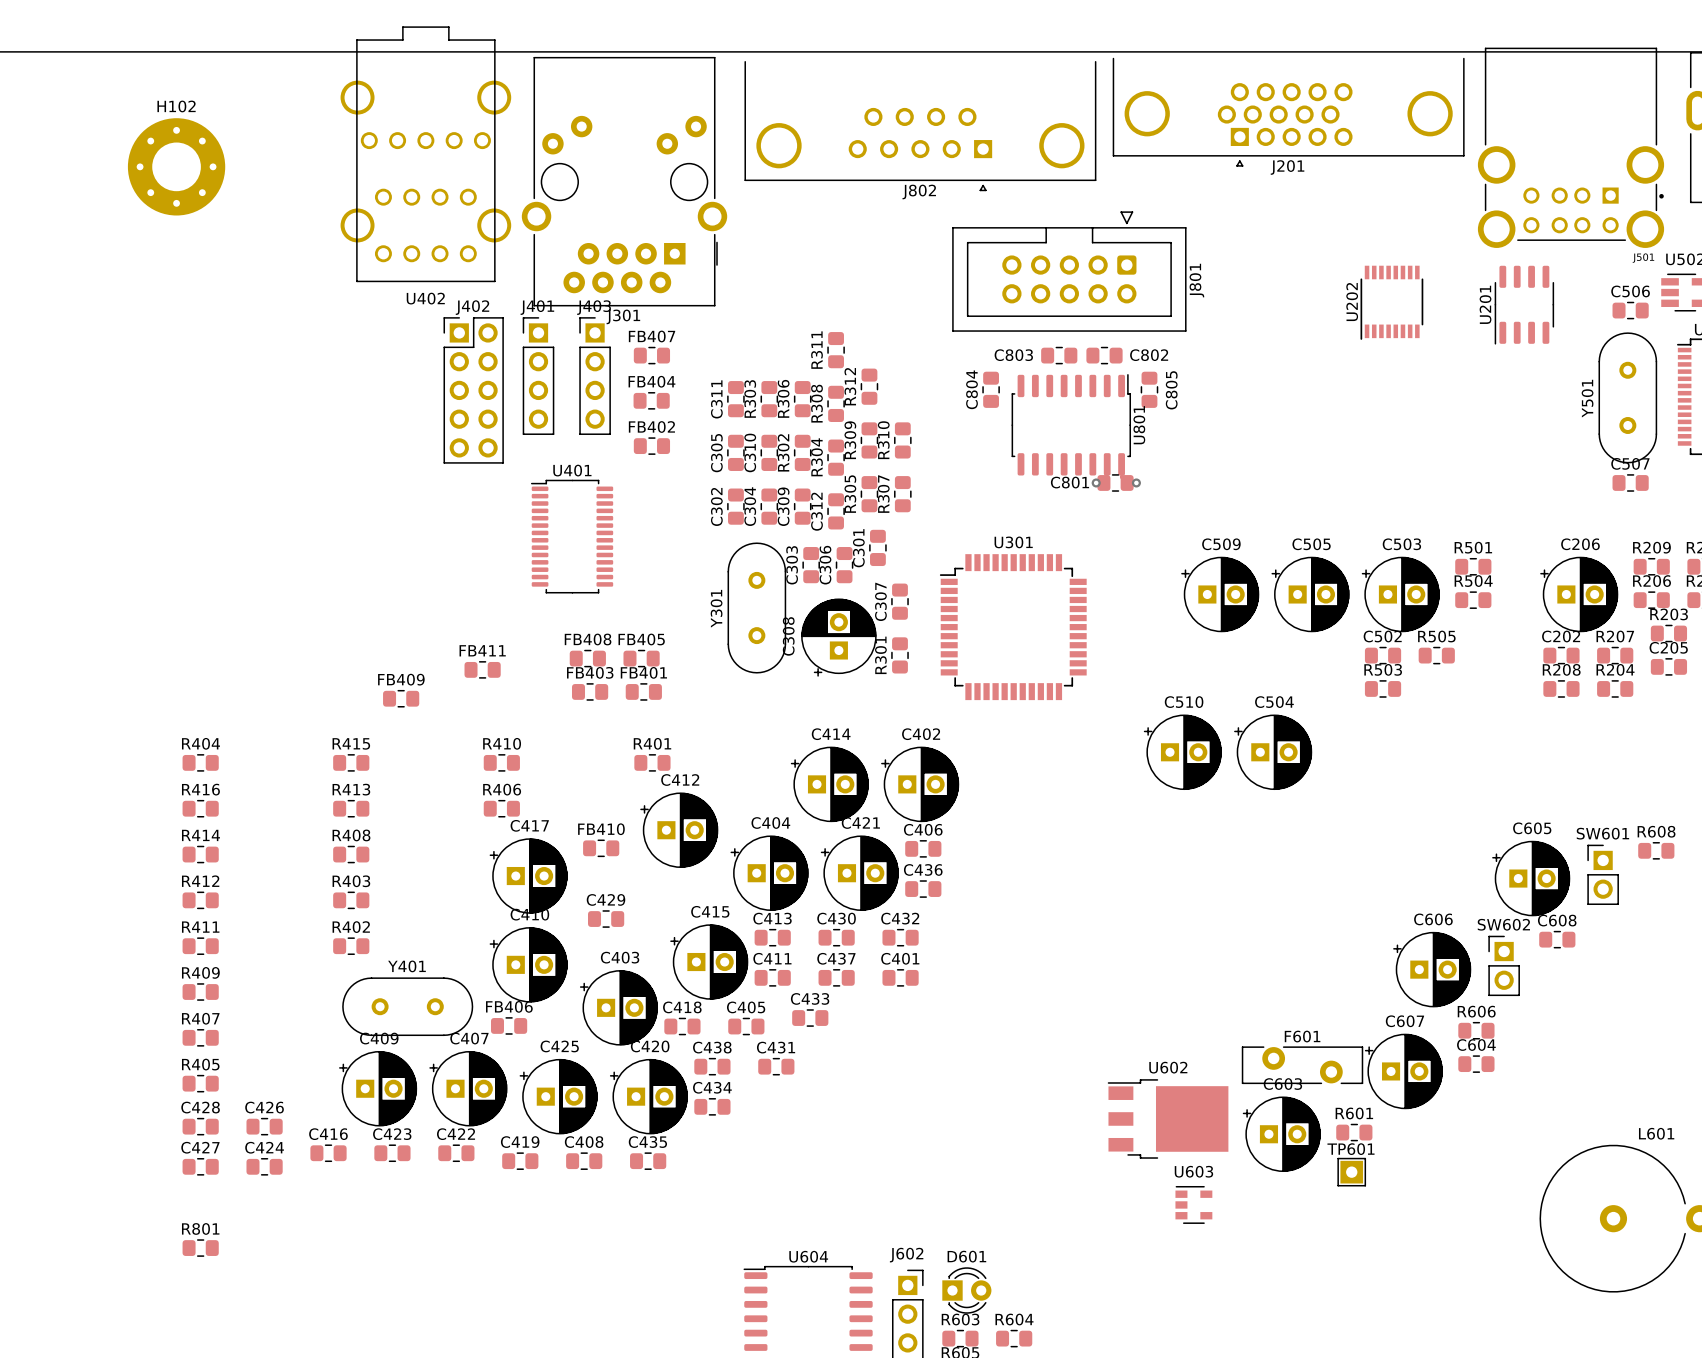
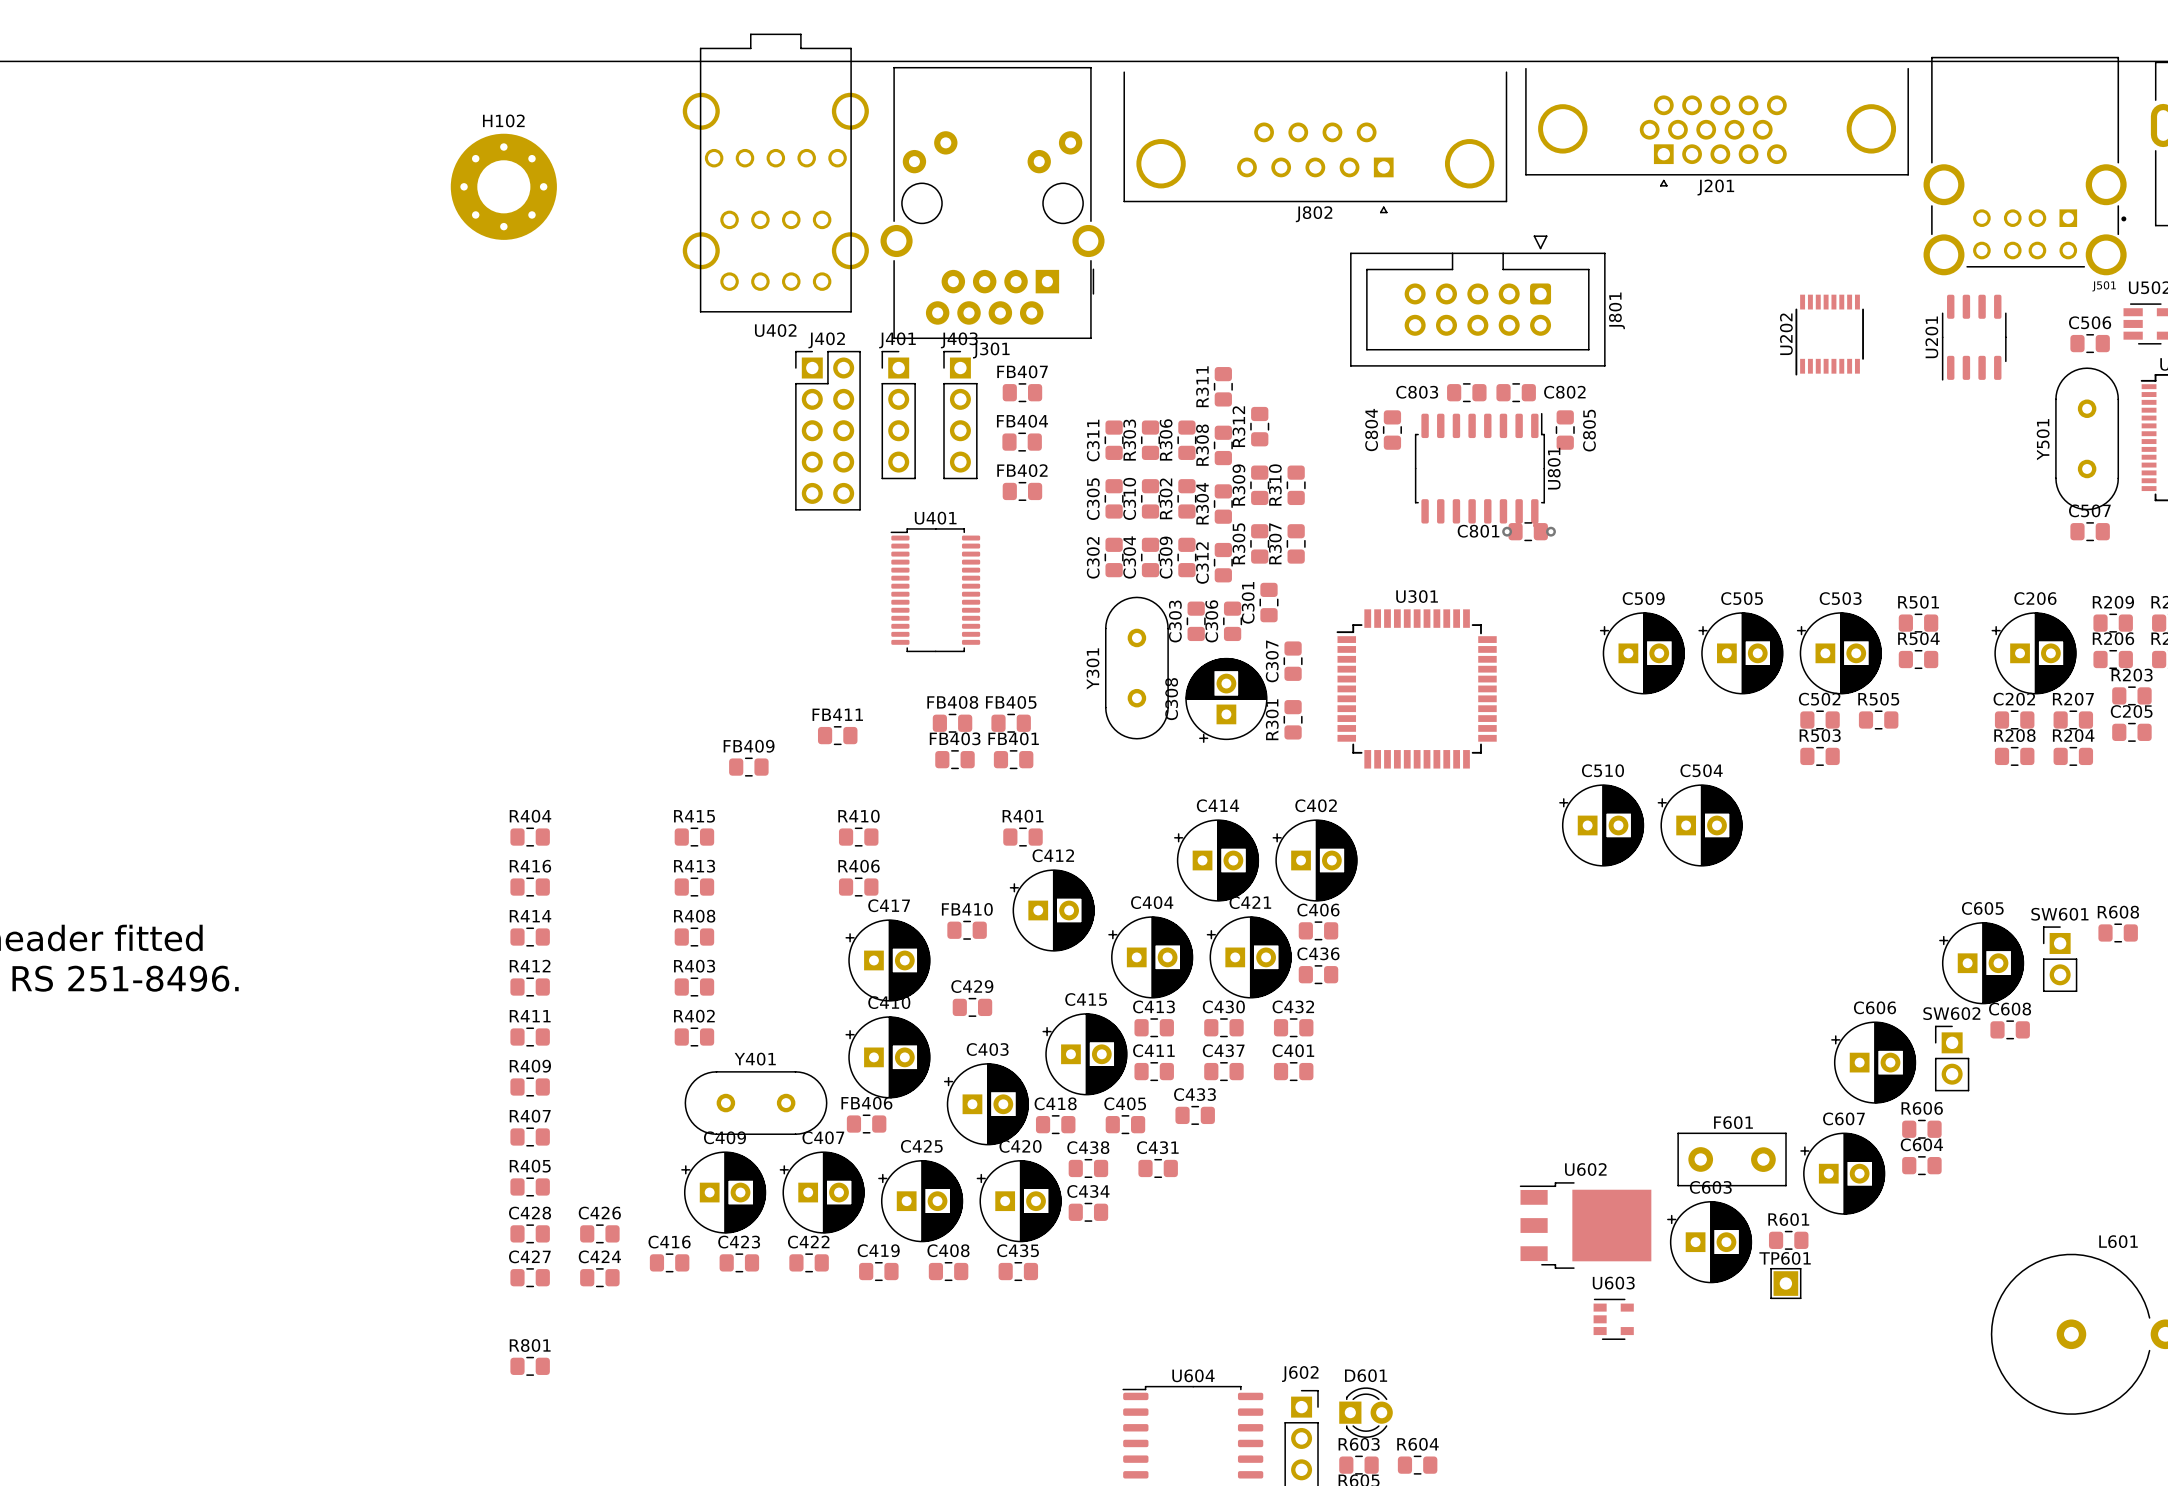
F601 footprint: [1241, 1046, 1364, 1085] -> [1677, 1132, 1787, 1187]

